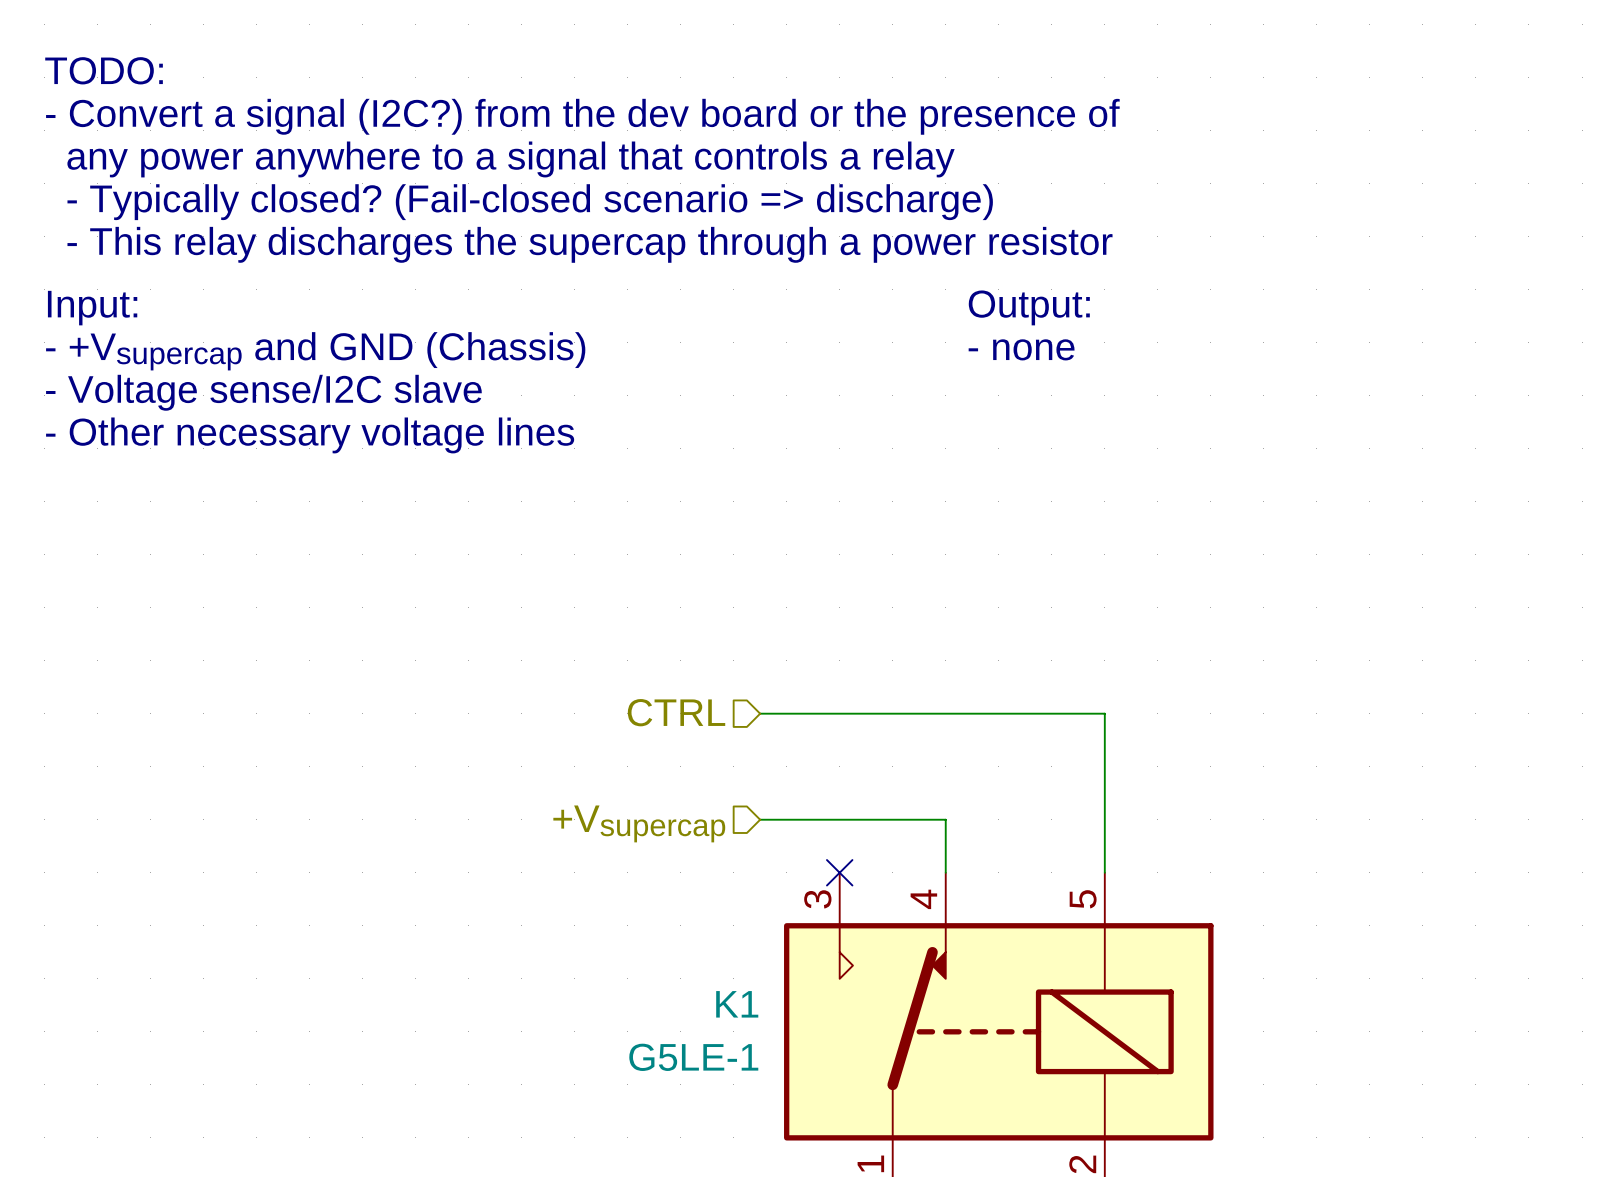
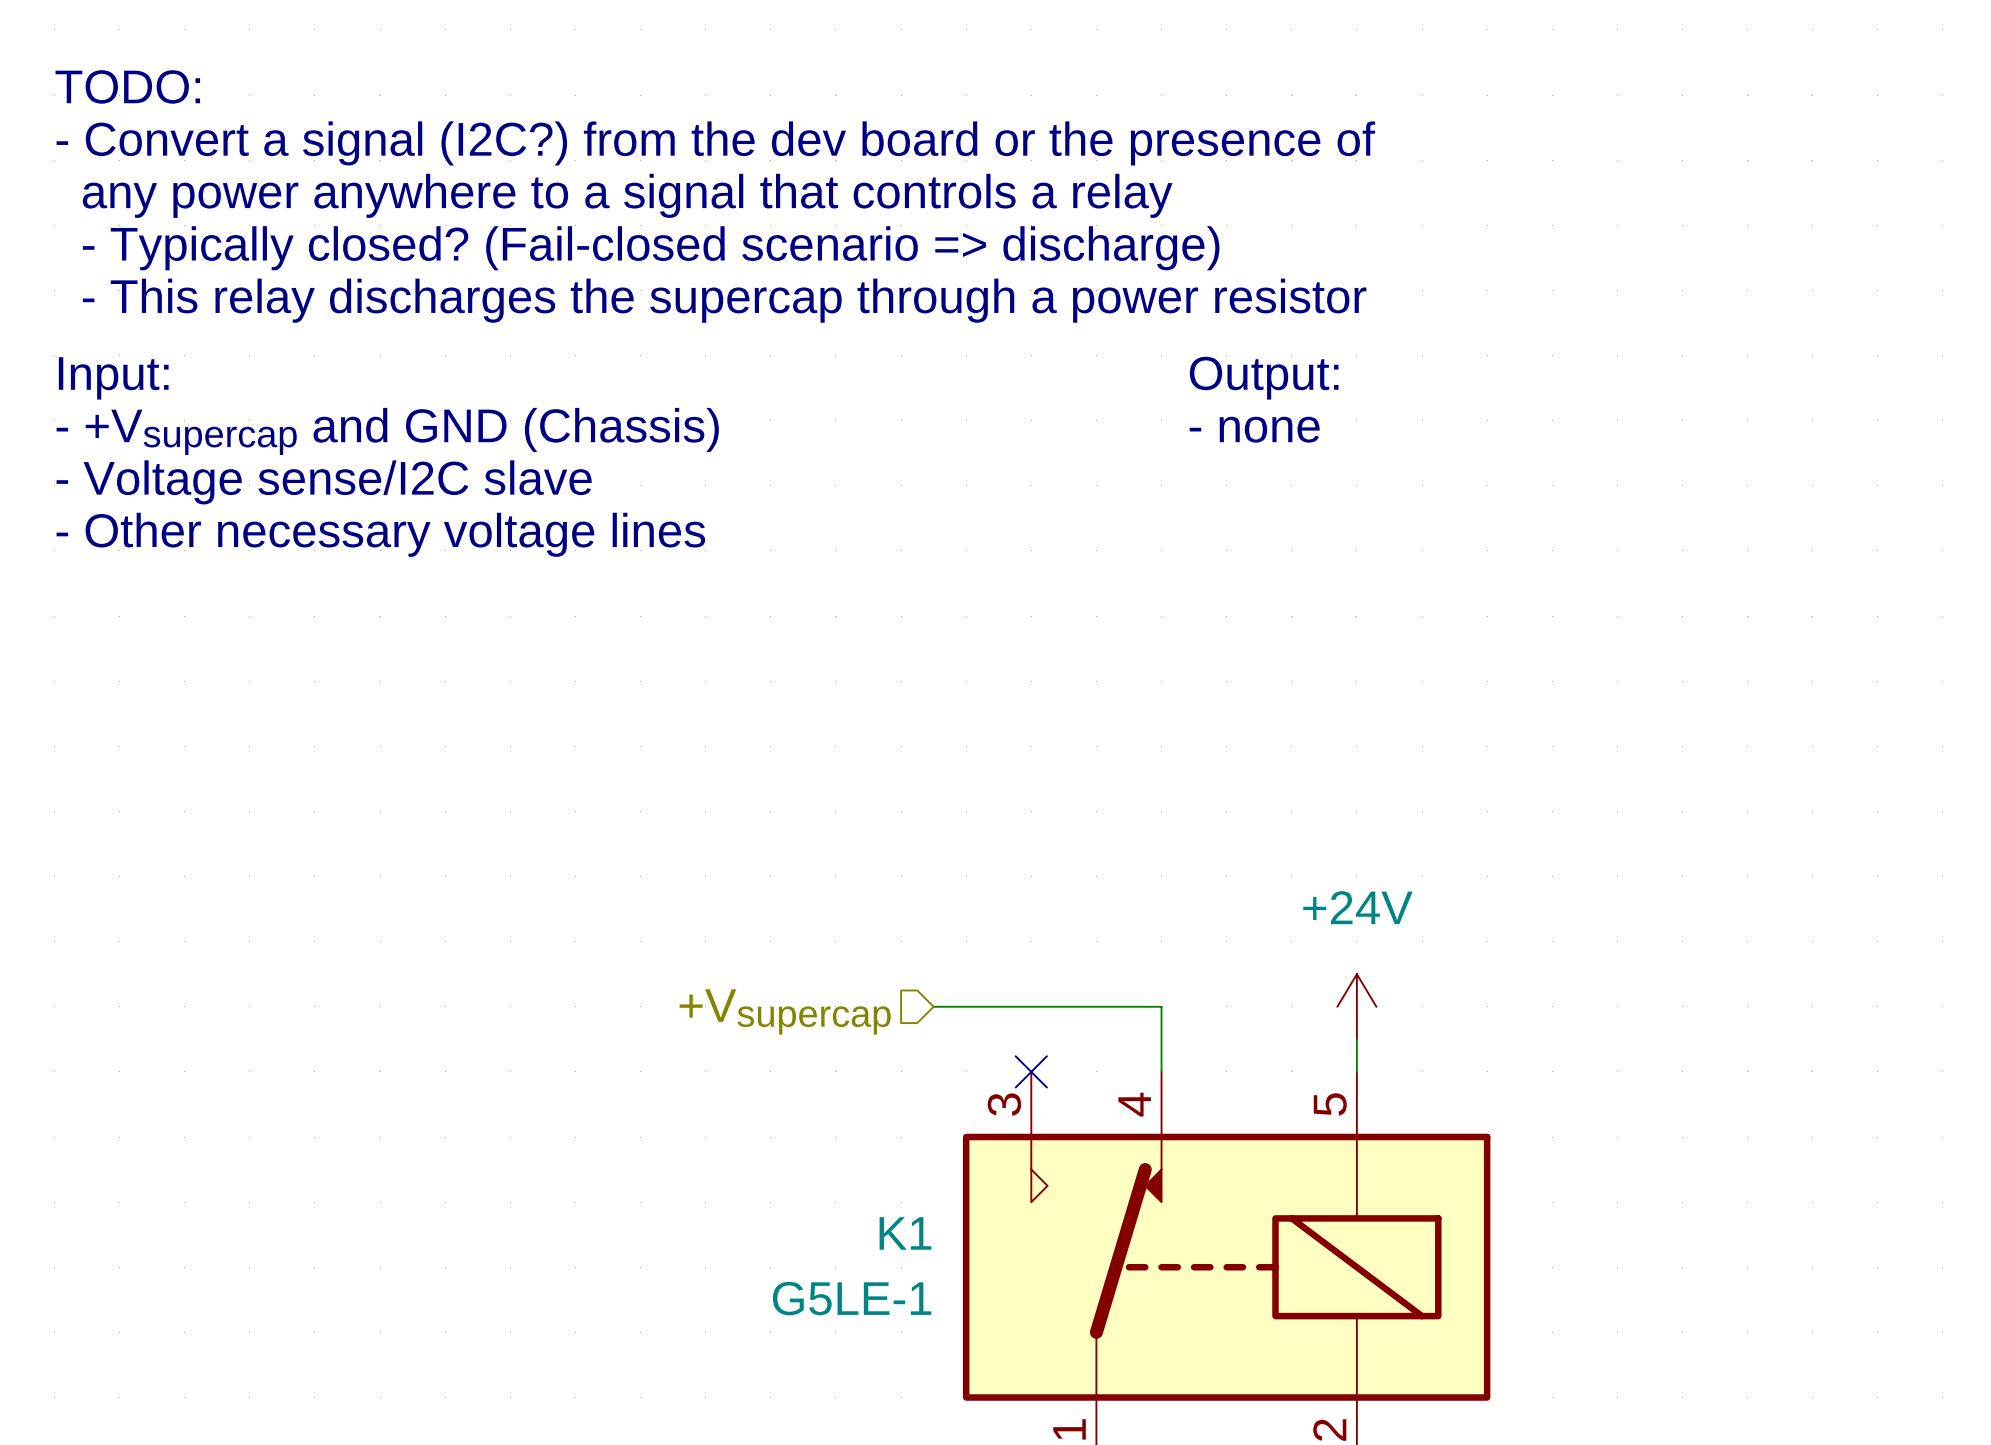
hierarchical label: CTRL (676, 712) -> none
wire: (760, 713) (1104, 713) (1104, 846) -> none
power symbol: none -> +24V (1356, 1006)

